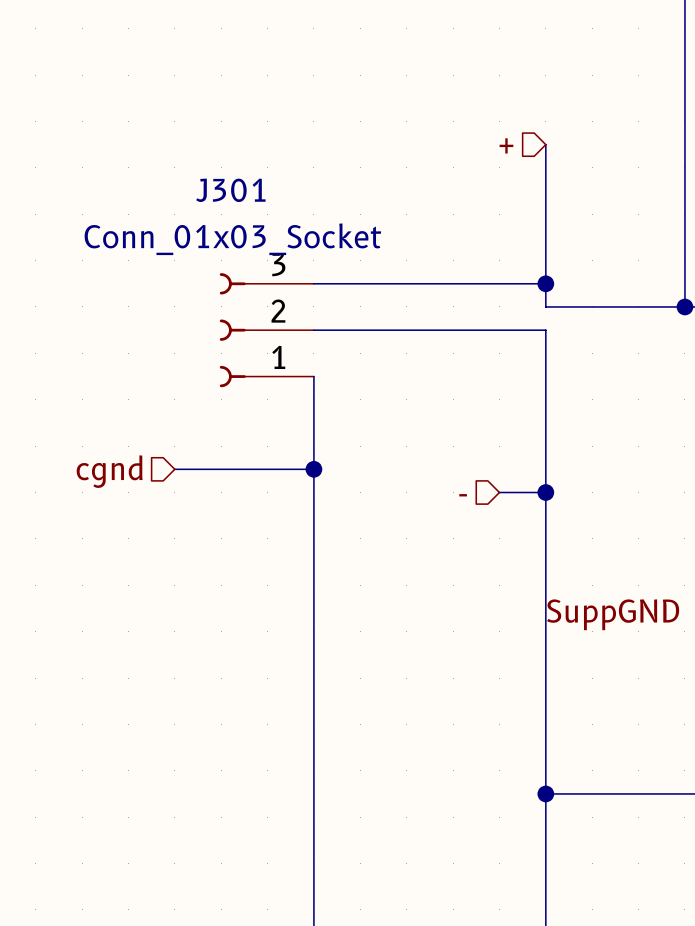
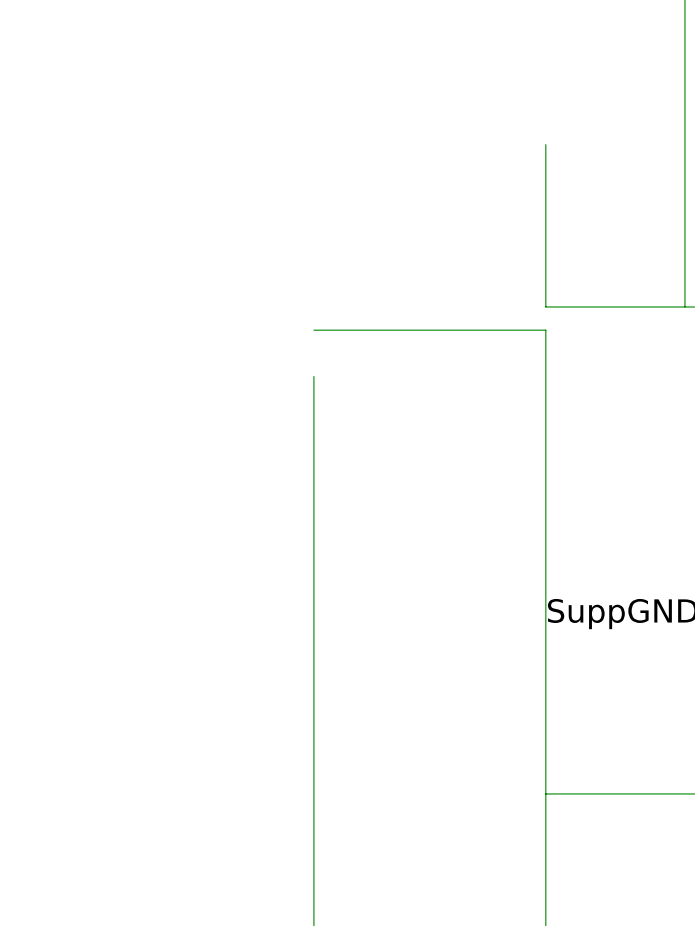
hierarchical label: + (506, 145) -> none
wire: (313, 283) (545, 283) -> none
junction: (545, 283) -> none
junction: (684, 306) -> none
J301: Conn_01x03_Socket (266, 330) -> none
wire: (174, 469) (313, 469) -> none
junction: (313, 469) -> none
hierarchical label: cgnd (109, 471) -> none
wire: (499, 492) (545, 492) -> none
junction: (545, 492) -> none
hierarchical label: - (463, 495) -> none
junction: (545, 793) -> none

